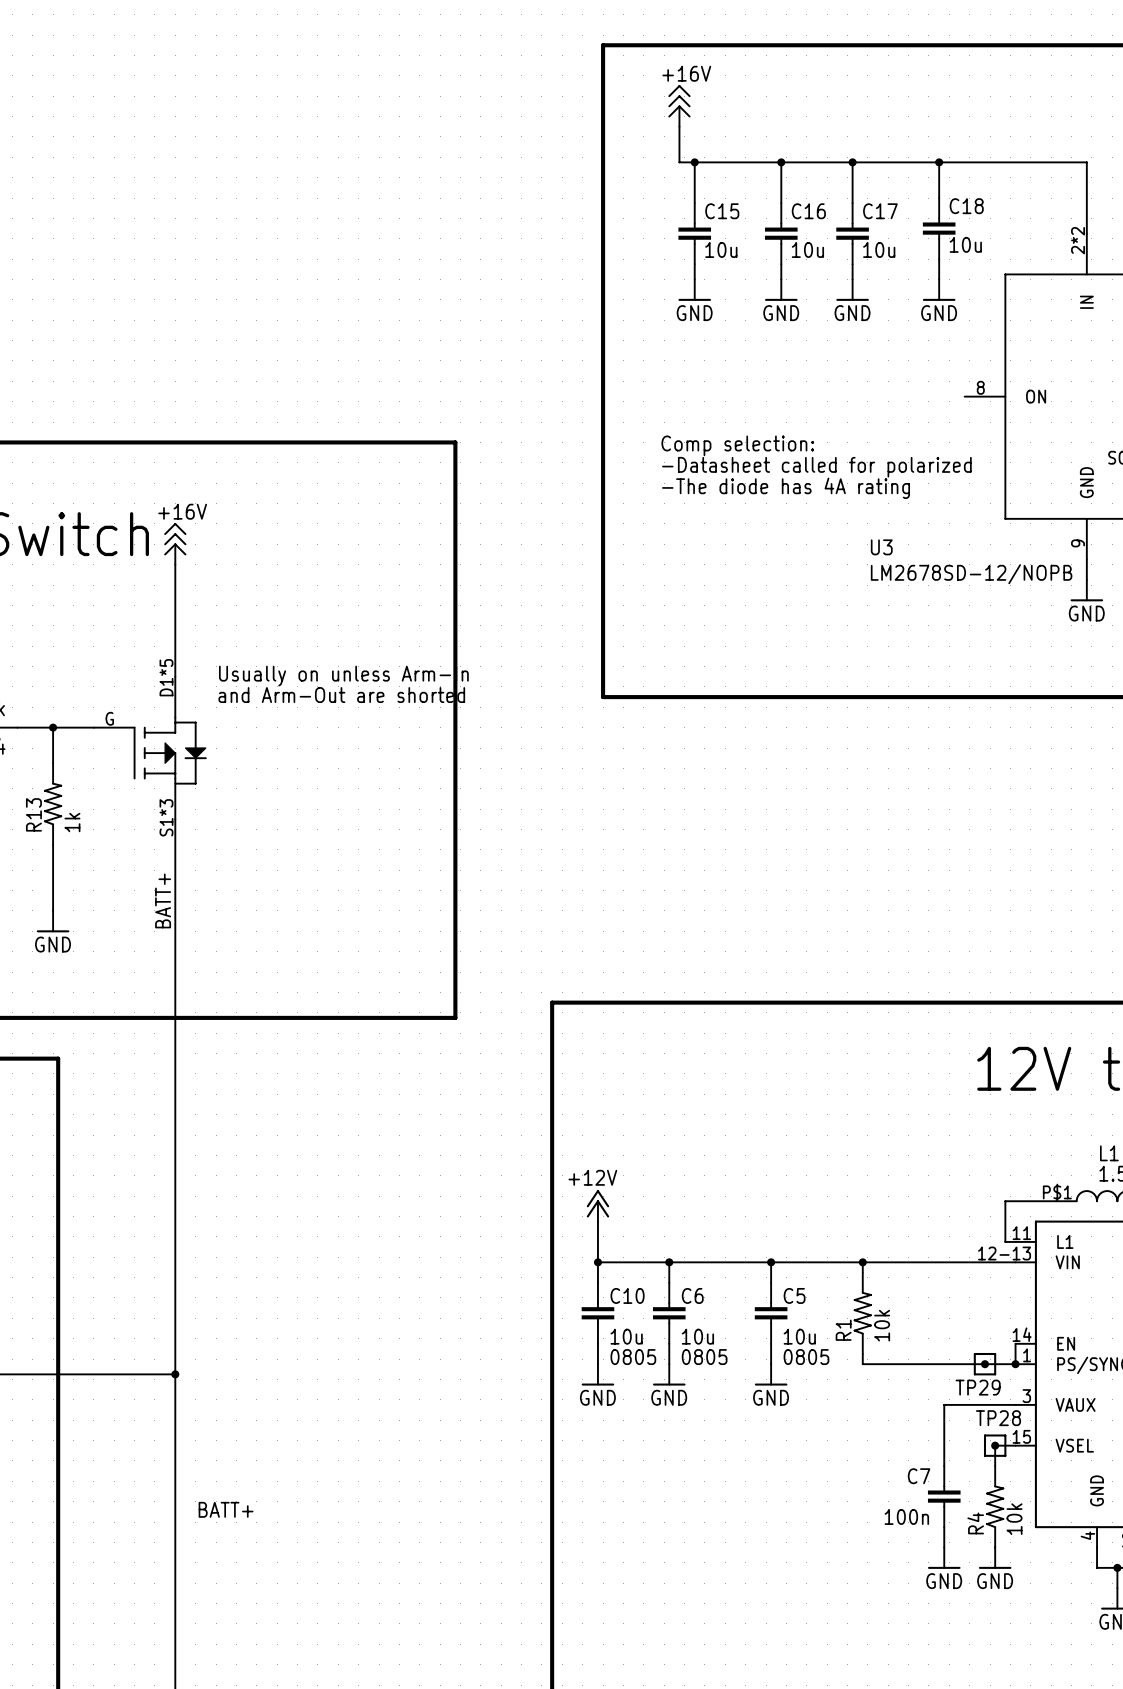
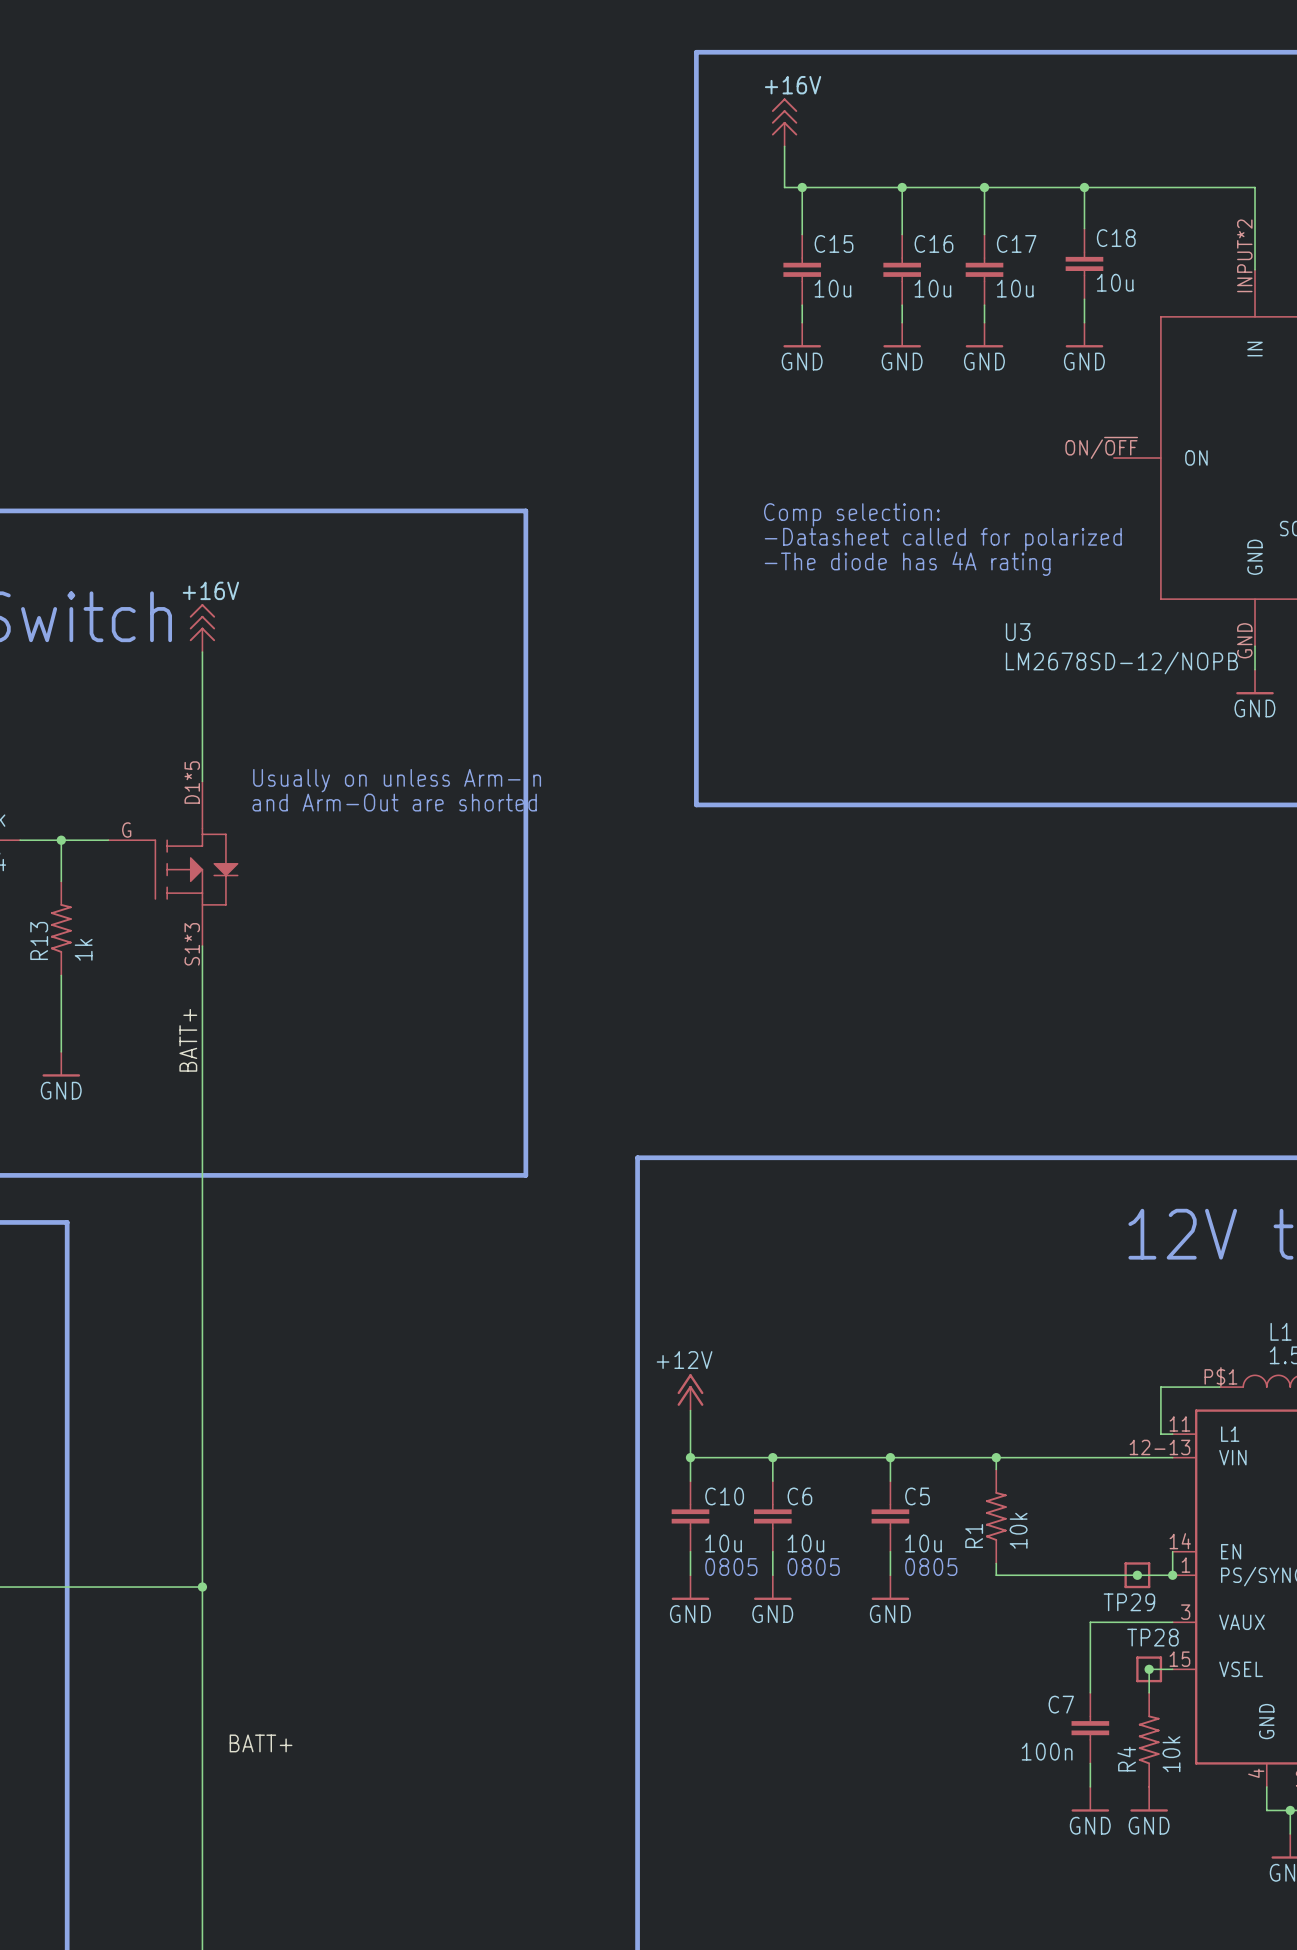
U3 pin number: 2*2 (1078, 240) -> INPUT*2 (1244, 255)
U3 pin number: 8 (980, 387) -> ON/~{OFF} (1101, 447)
U3 pin number: 9 (1078, 543) -> GND (1244, 640)

